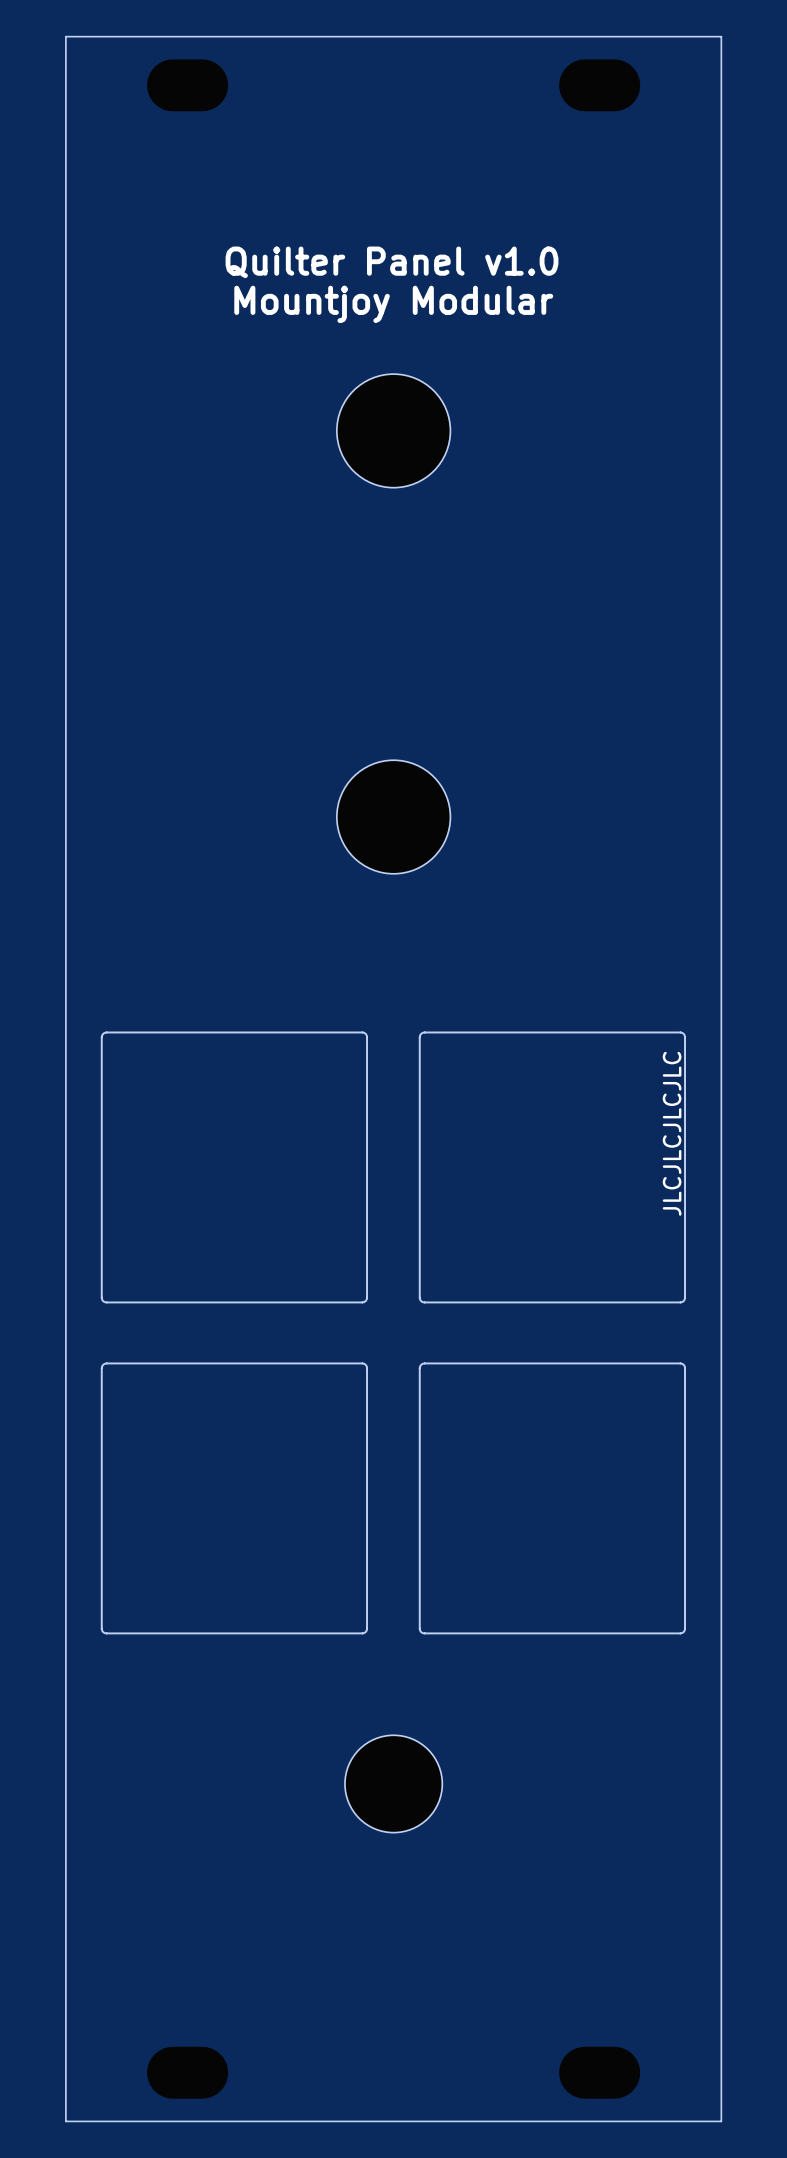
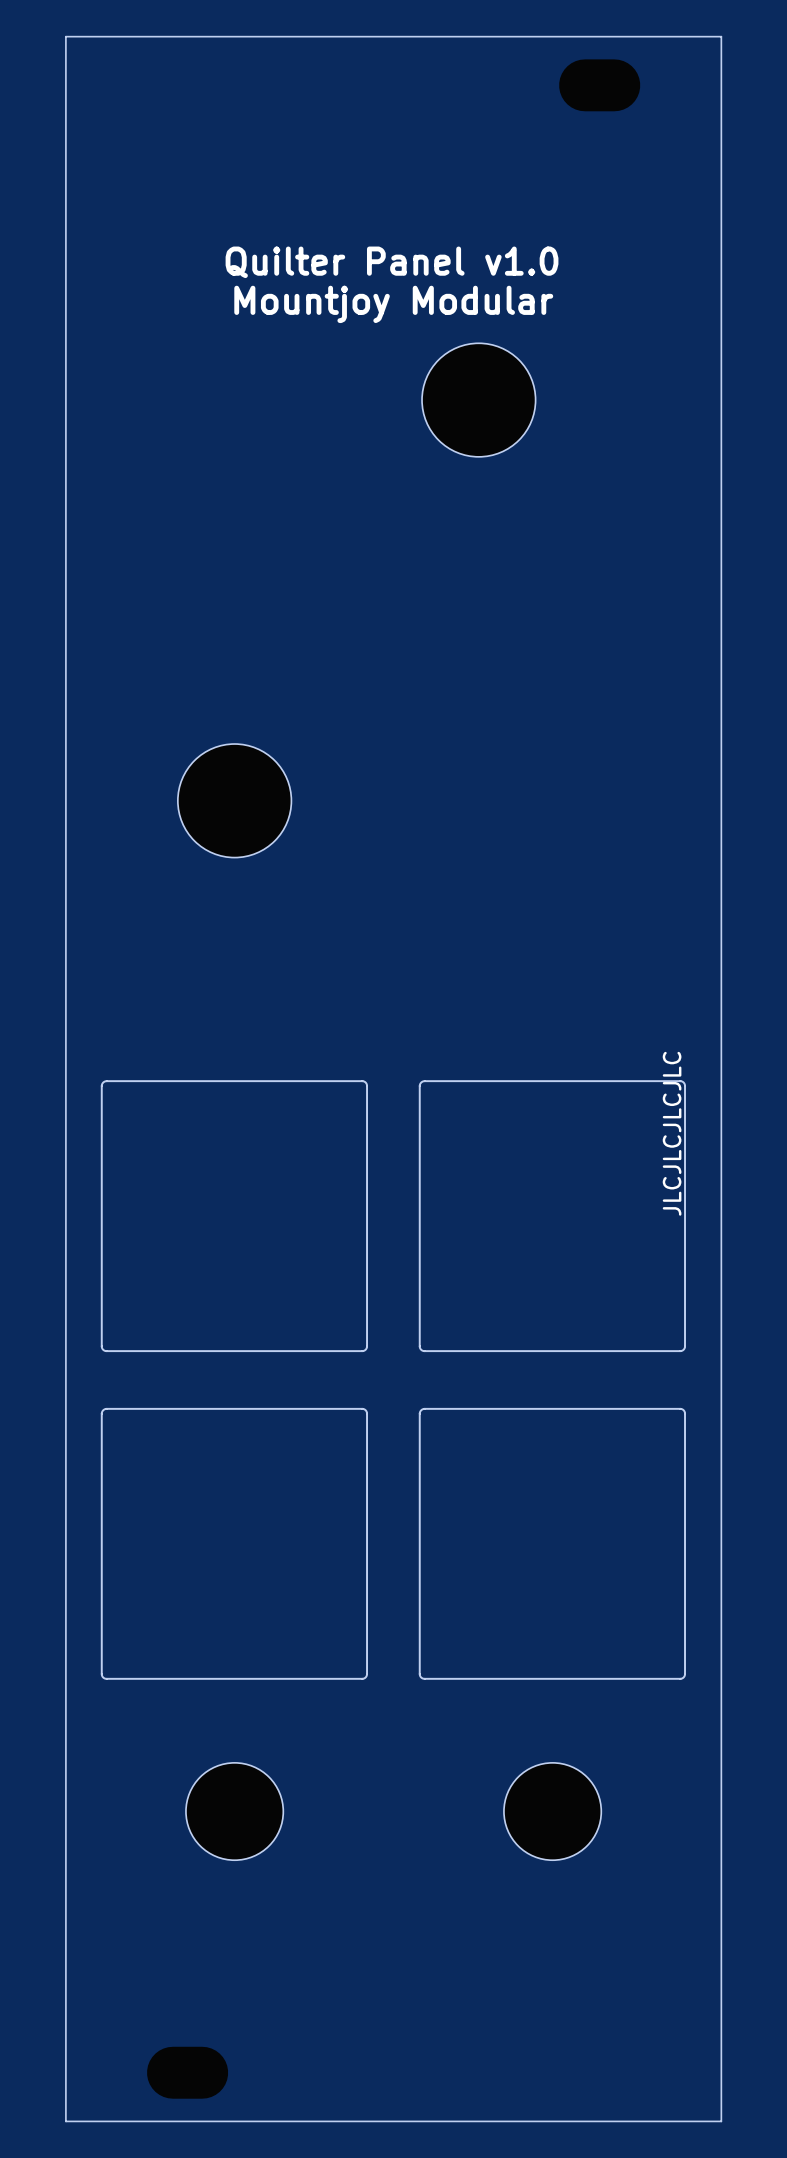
part: (187, 85) -> none
part position: (393, 430) -> (478, 400)
part position: (393, 817) -> (234, 800)
drawing position: (234, 1167) -> (234, 1216)
drawing position: (552, 1167) -> (552, 1216)
drawing position: (234, 1498) -> (234, 1543)
drawing position: (552, 1498) -> (552, 1543)
part: (393, 1783) -> none
part: none -> (234, 1811)
part: none -> (552, 1811)
part: (599, 2072) -> none

